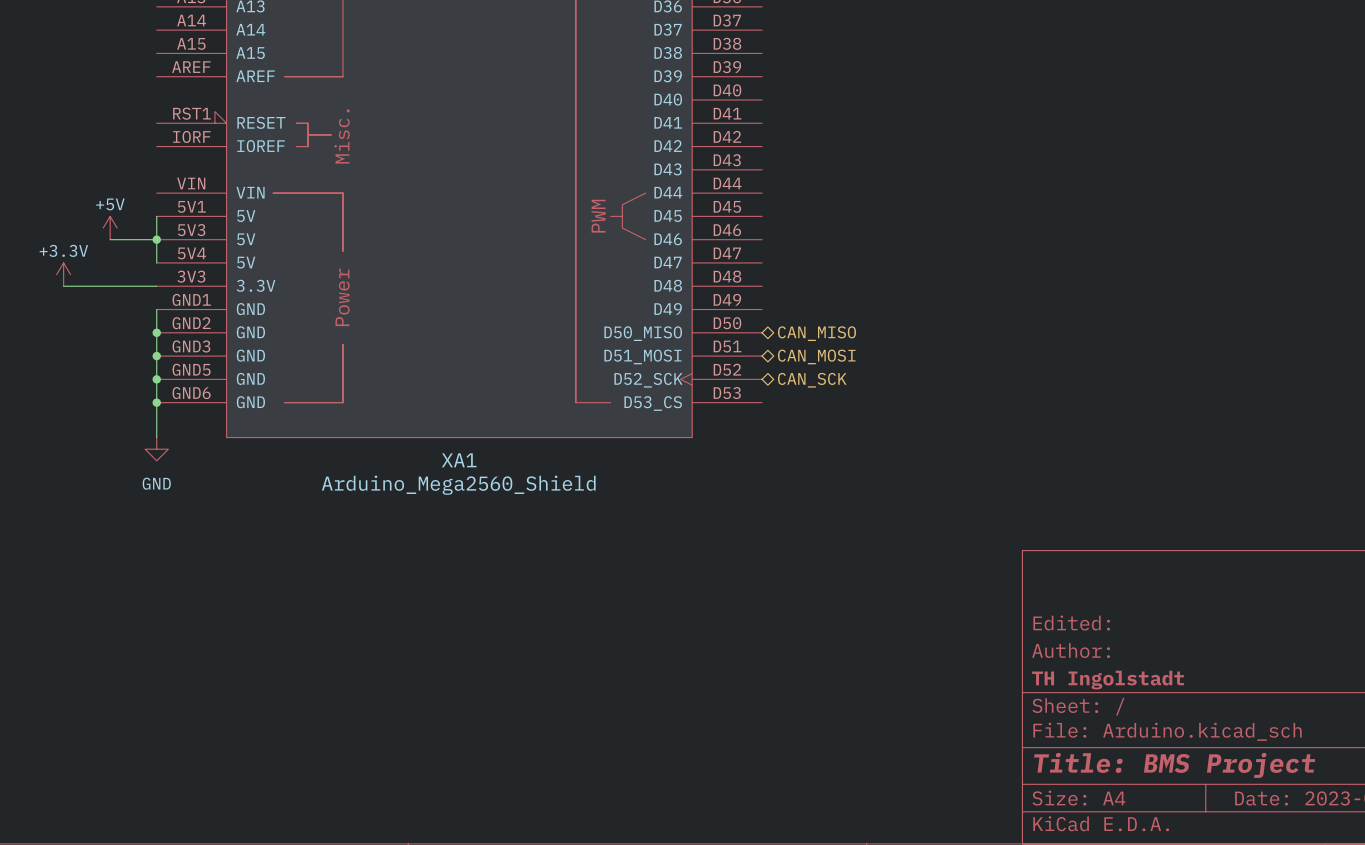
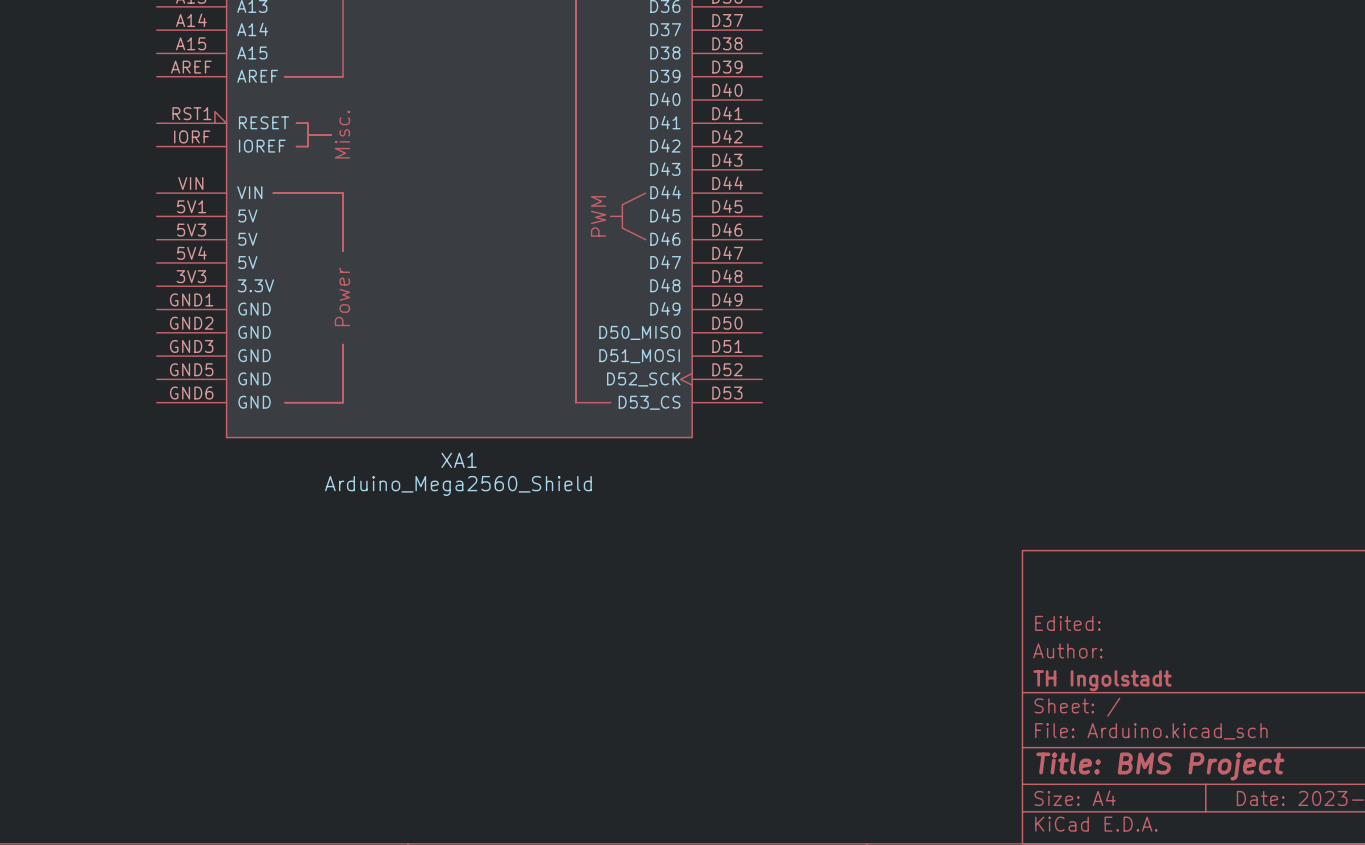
wire: (156, 216) (156, 262) -> none
power symbol: +5V (110, 228) -> none
wire: (110, 239) (156, 239) -> none
junction: (156, 239) -> none
power symbol: +3.3V (63, 274) -> none
wire: (63, 286) (156, 286) -> none
wire: (156, 309) (156, 437) -> none
junction: (156, 332) -> none
hierarchical label: CAN_MISO (816, 333) -> none
junction: (156, 356) -> none
hierarchical label: CAN_MOSI (816, 356) -> none
junction: (156, 379) -> none
hierarchical label: CAN_SCK (812, 380) -> none
junction: (156, 402) -> none
power symbol: GND (156, 449) -> none

